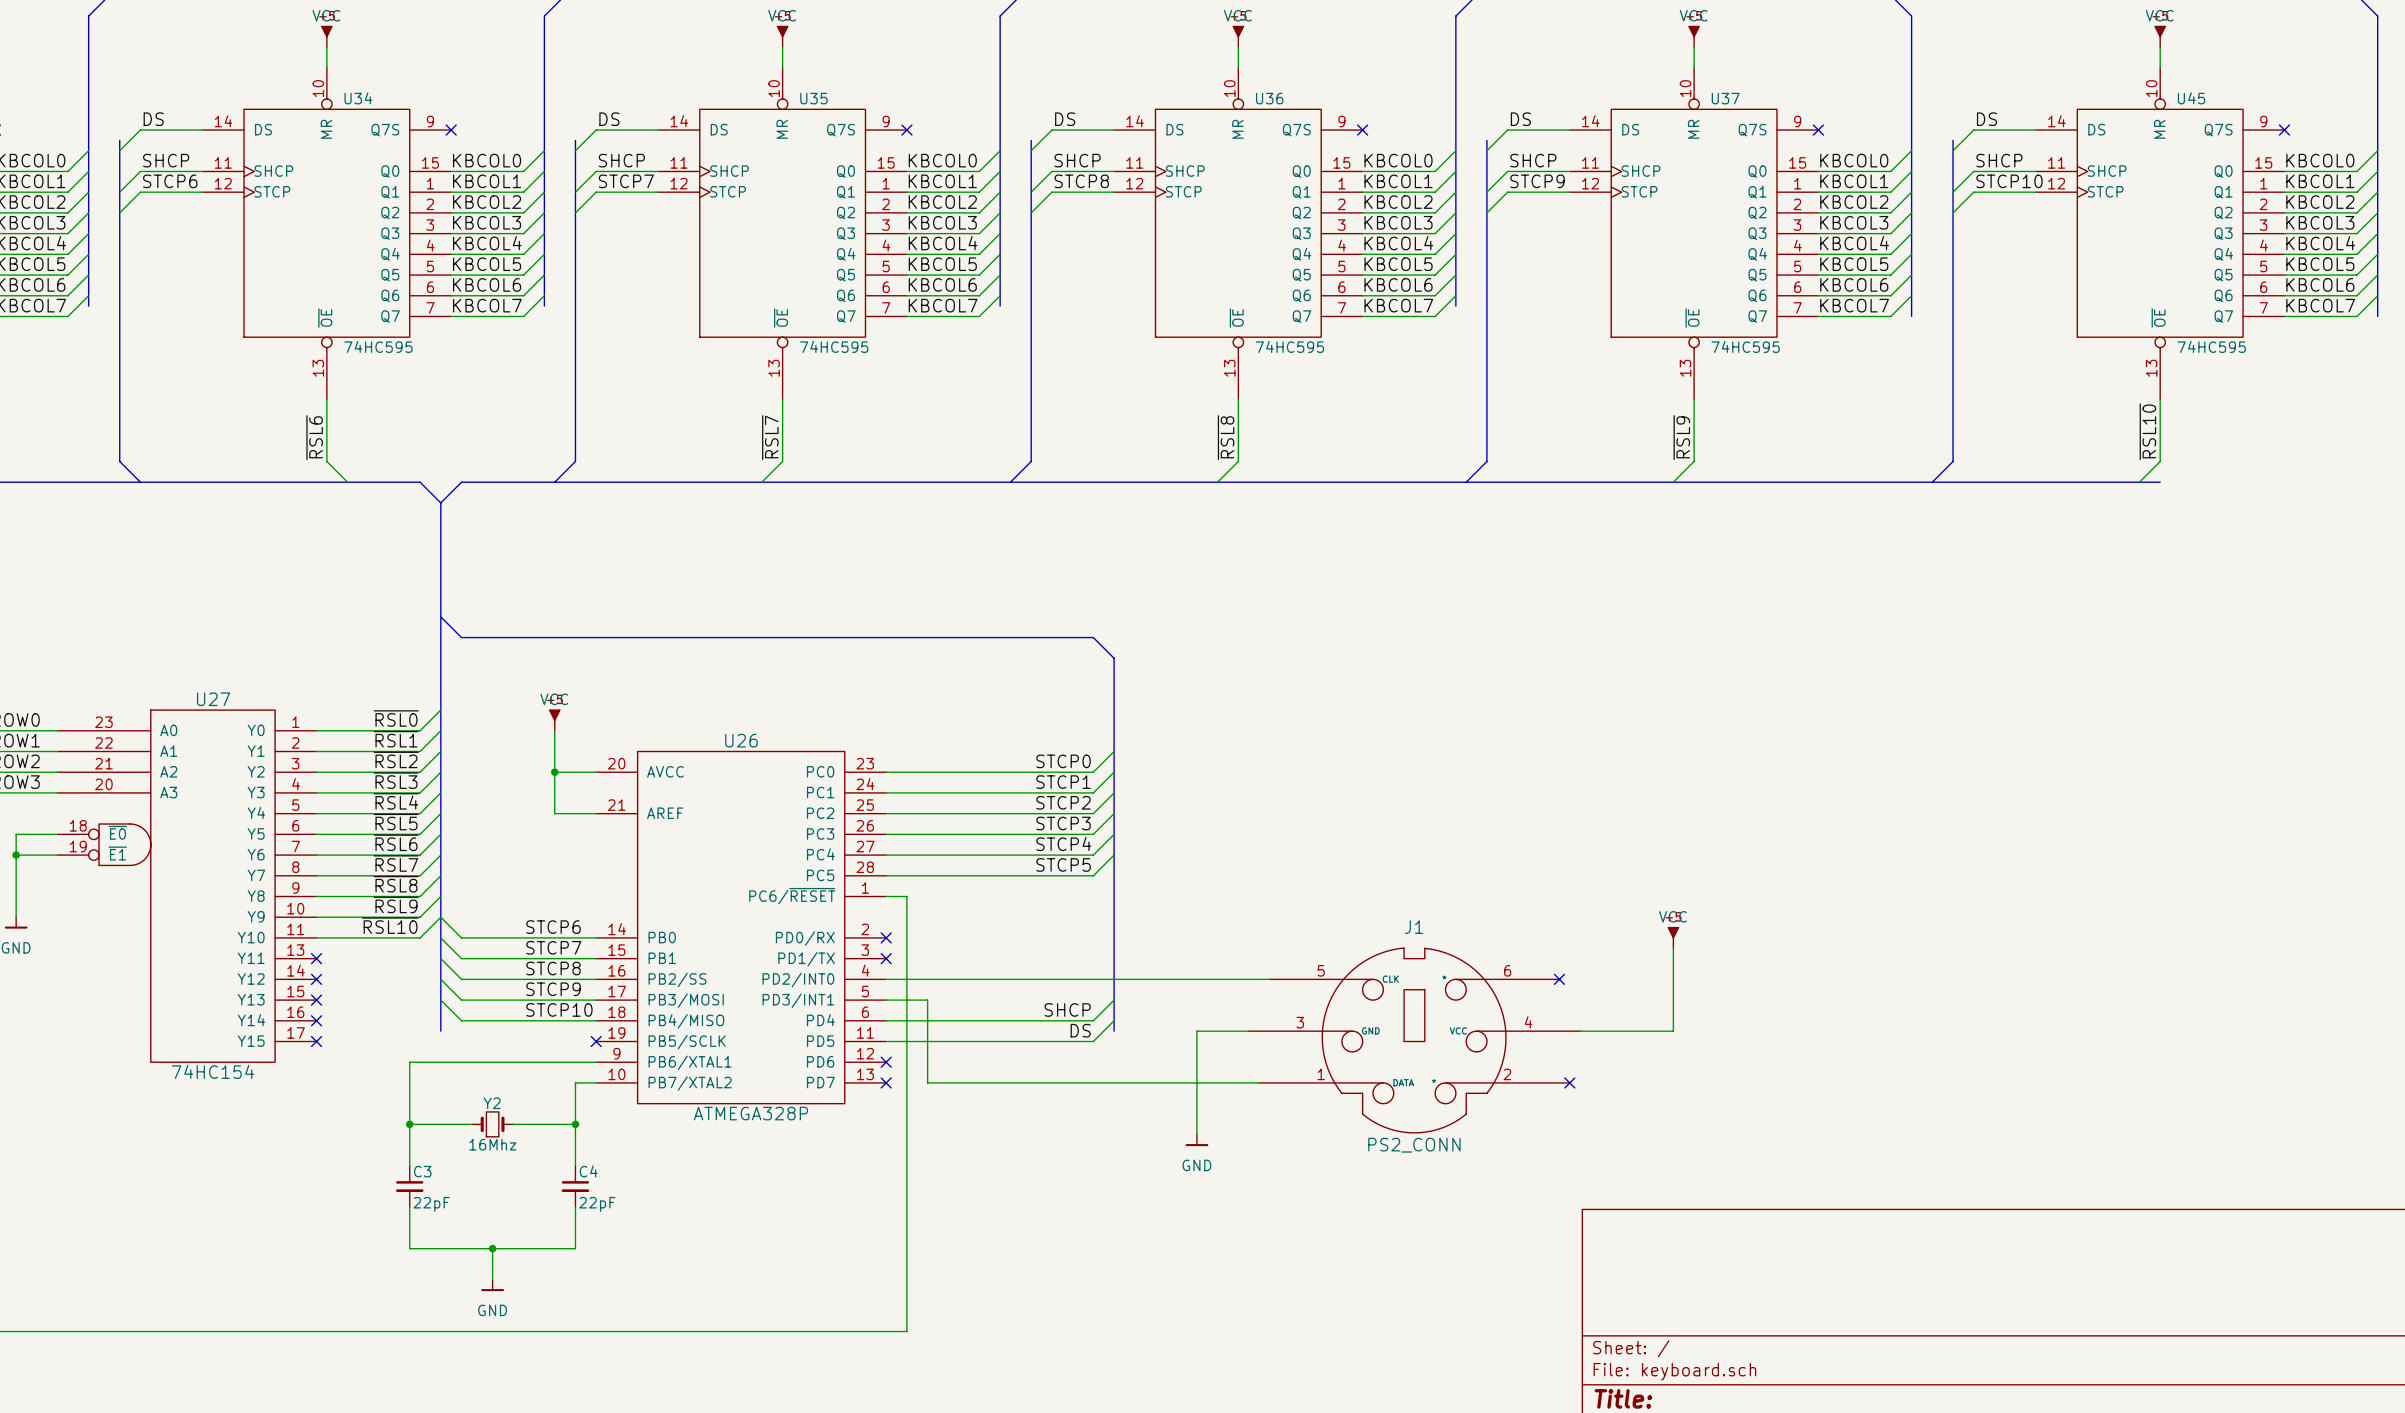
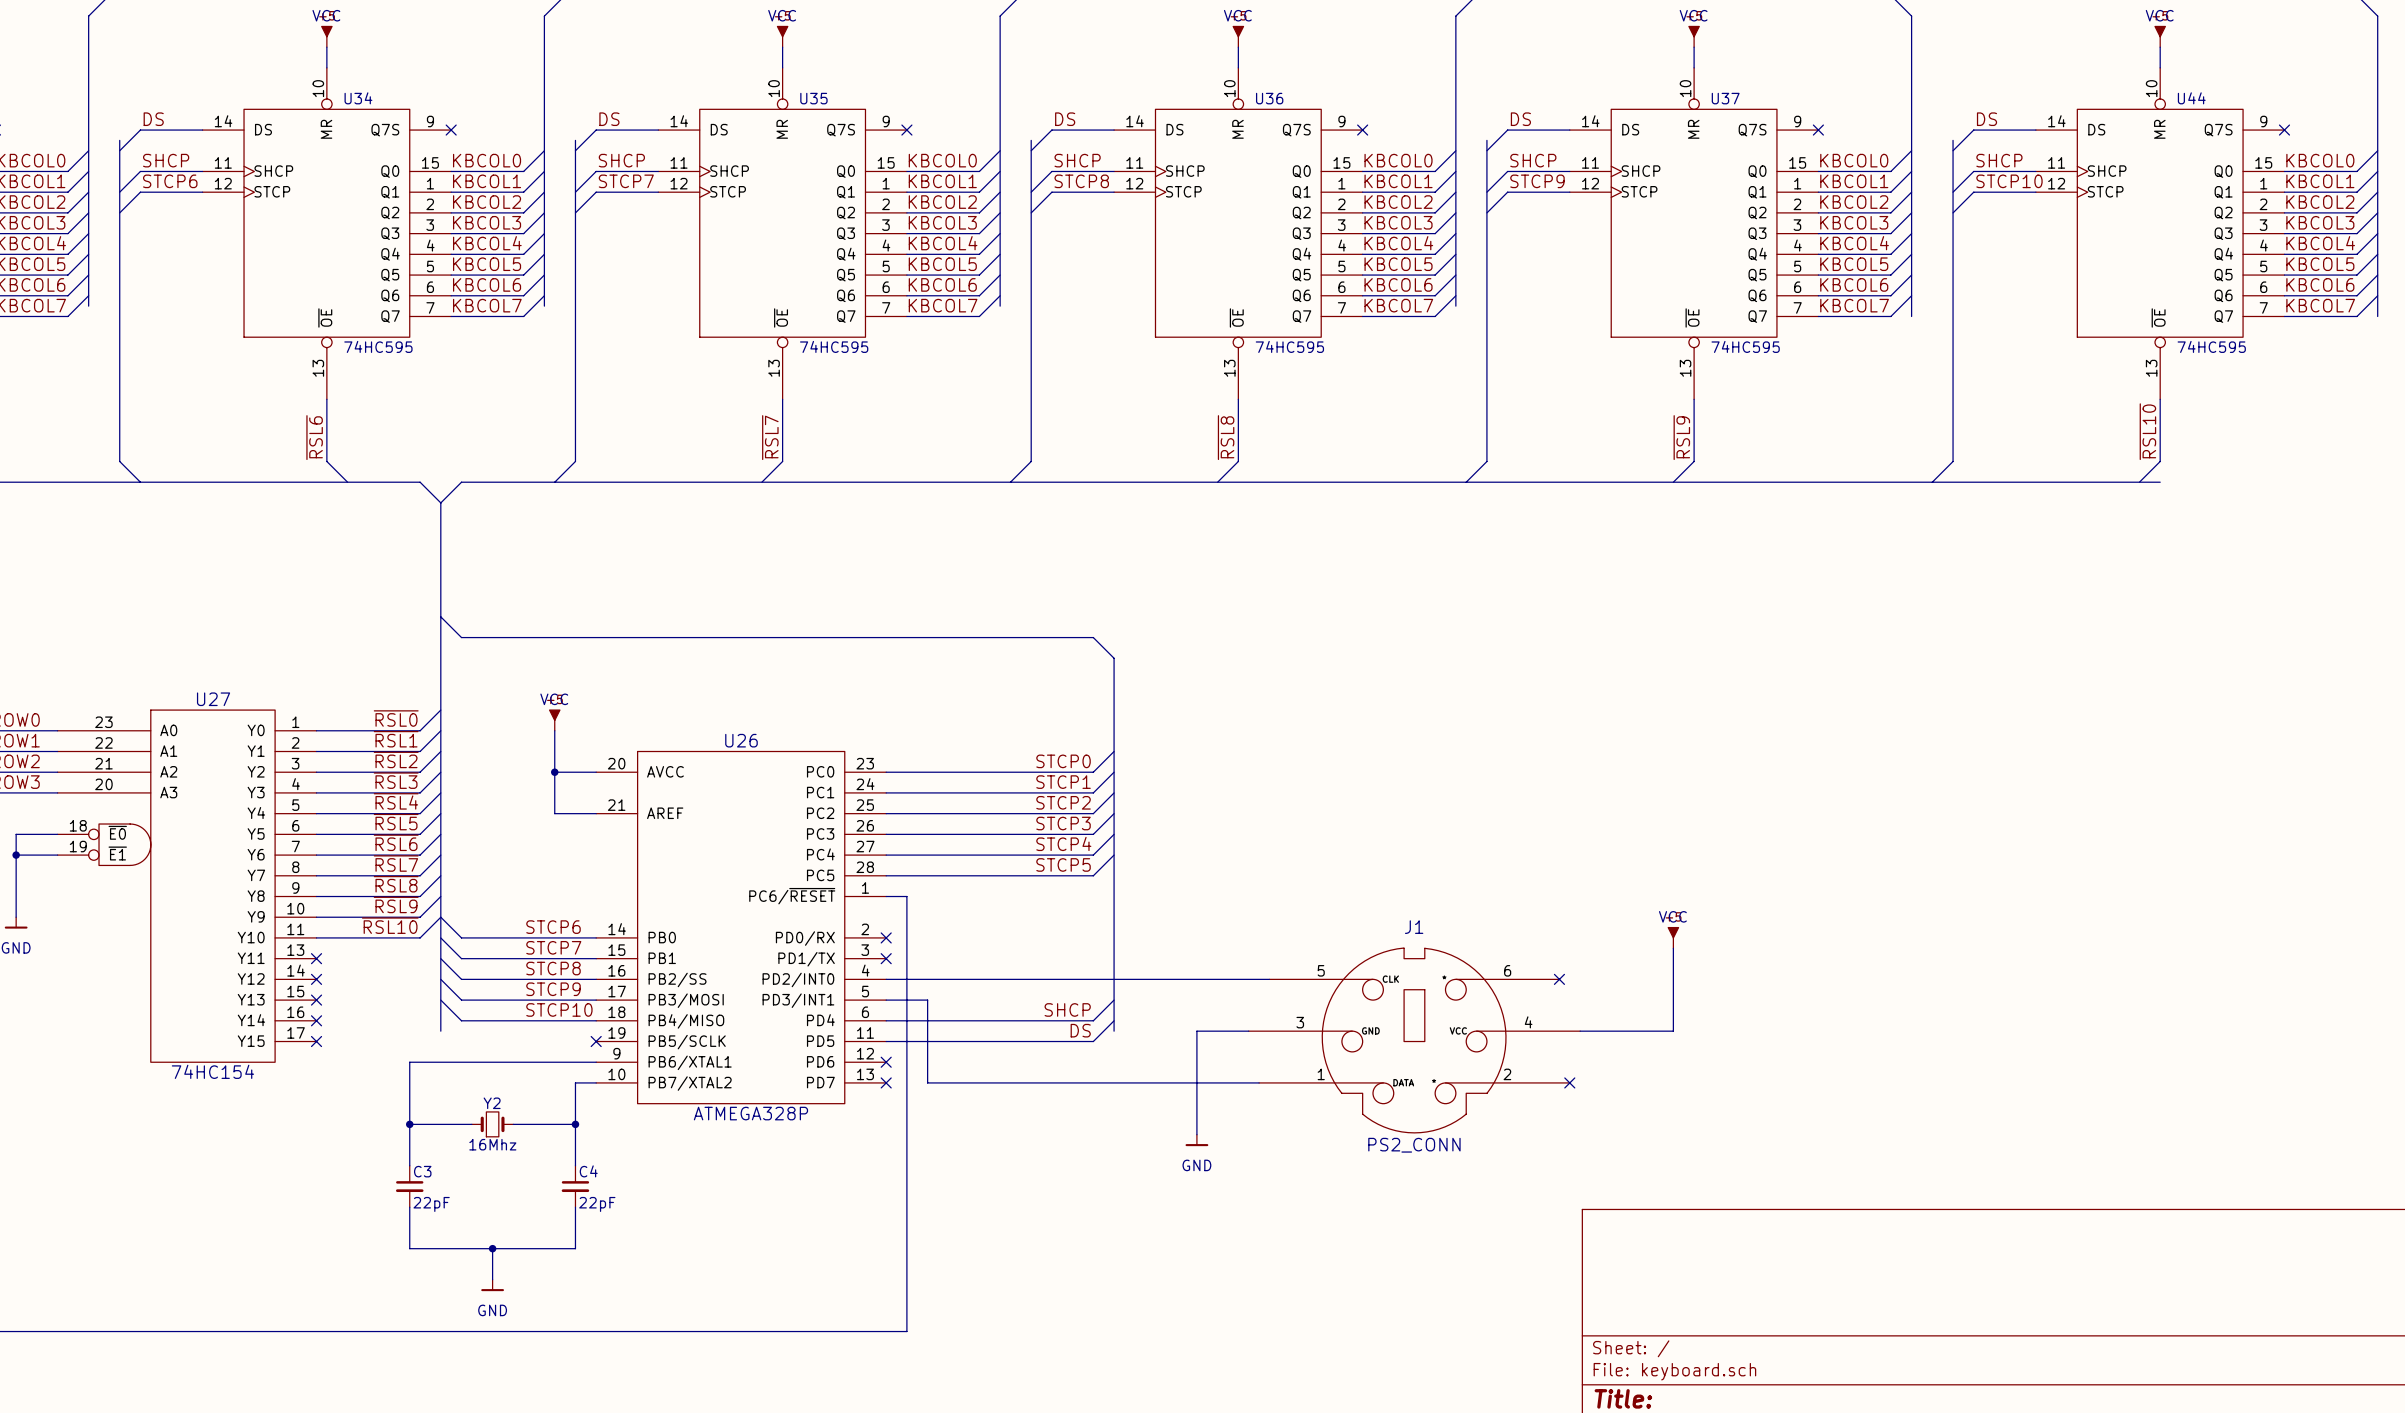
U45 name: U45 (2191, 98) -> U44 (2191, 98)

